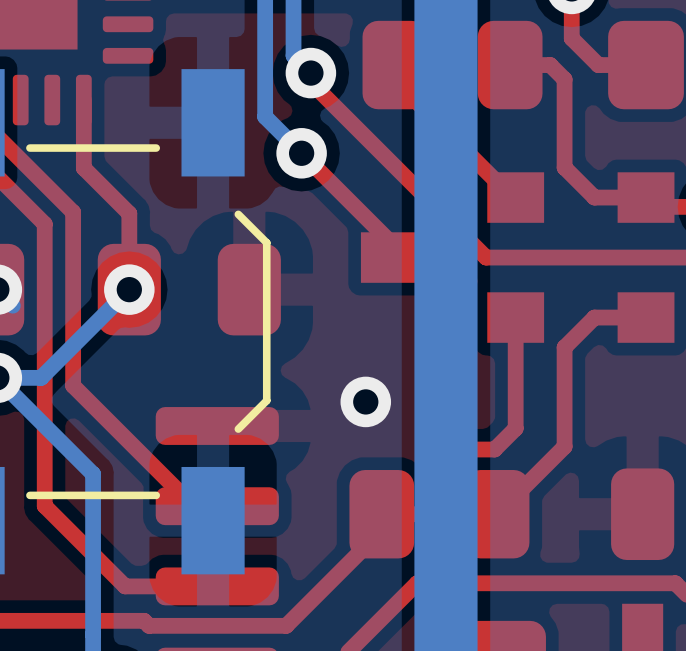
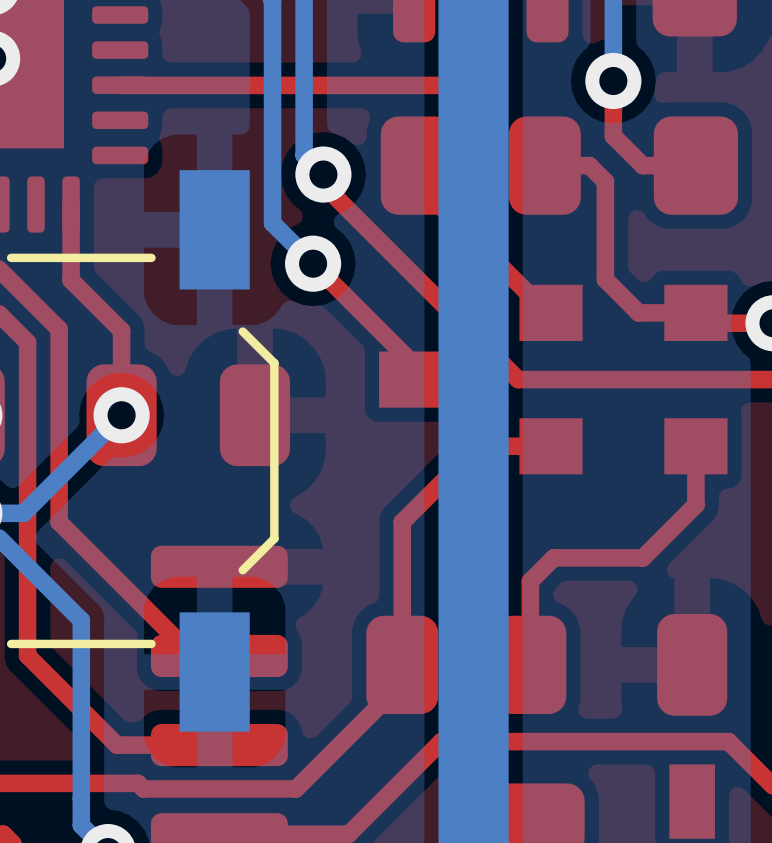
top track: (515, 317) (515, 428) (494, 449) (465, 449) (444, 470) (444, 499) (429, 514) (381, 514) -> (551, 446) (478, 446) (402, 522) (402, 664)
top track: (646, 317) (594, 317) (564, 347) (564, 446) (497, 514) -> (695, 446) (695, 504) (642, 557) (553, 557) (530, 581) (530, 664)
via: (365, 401) -> none

